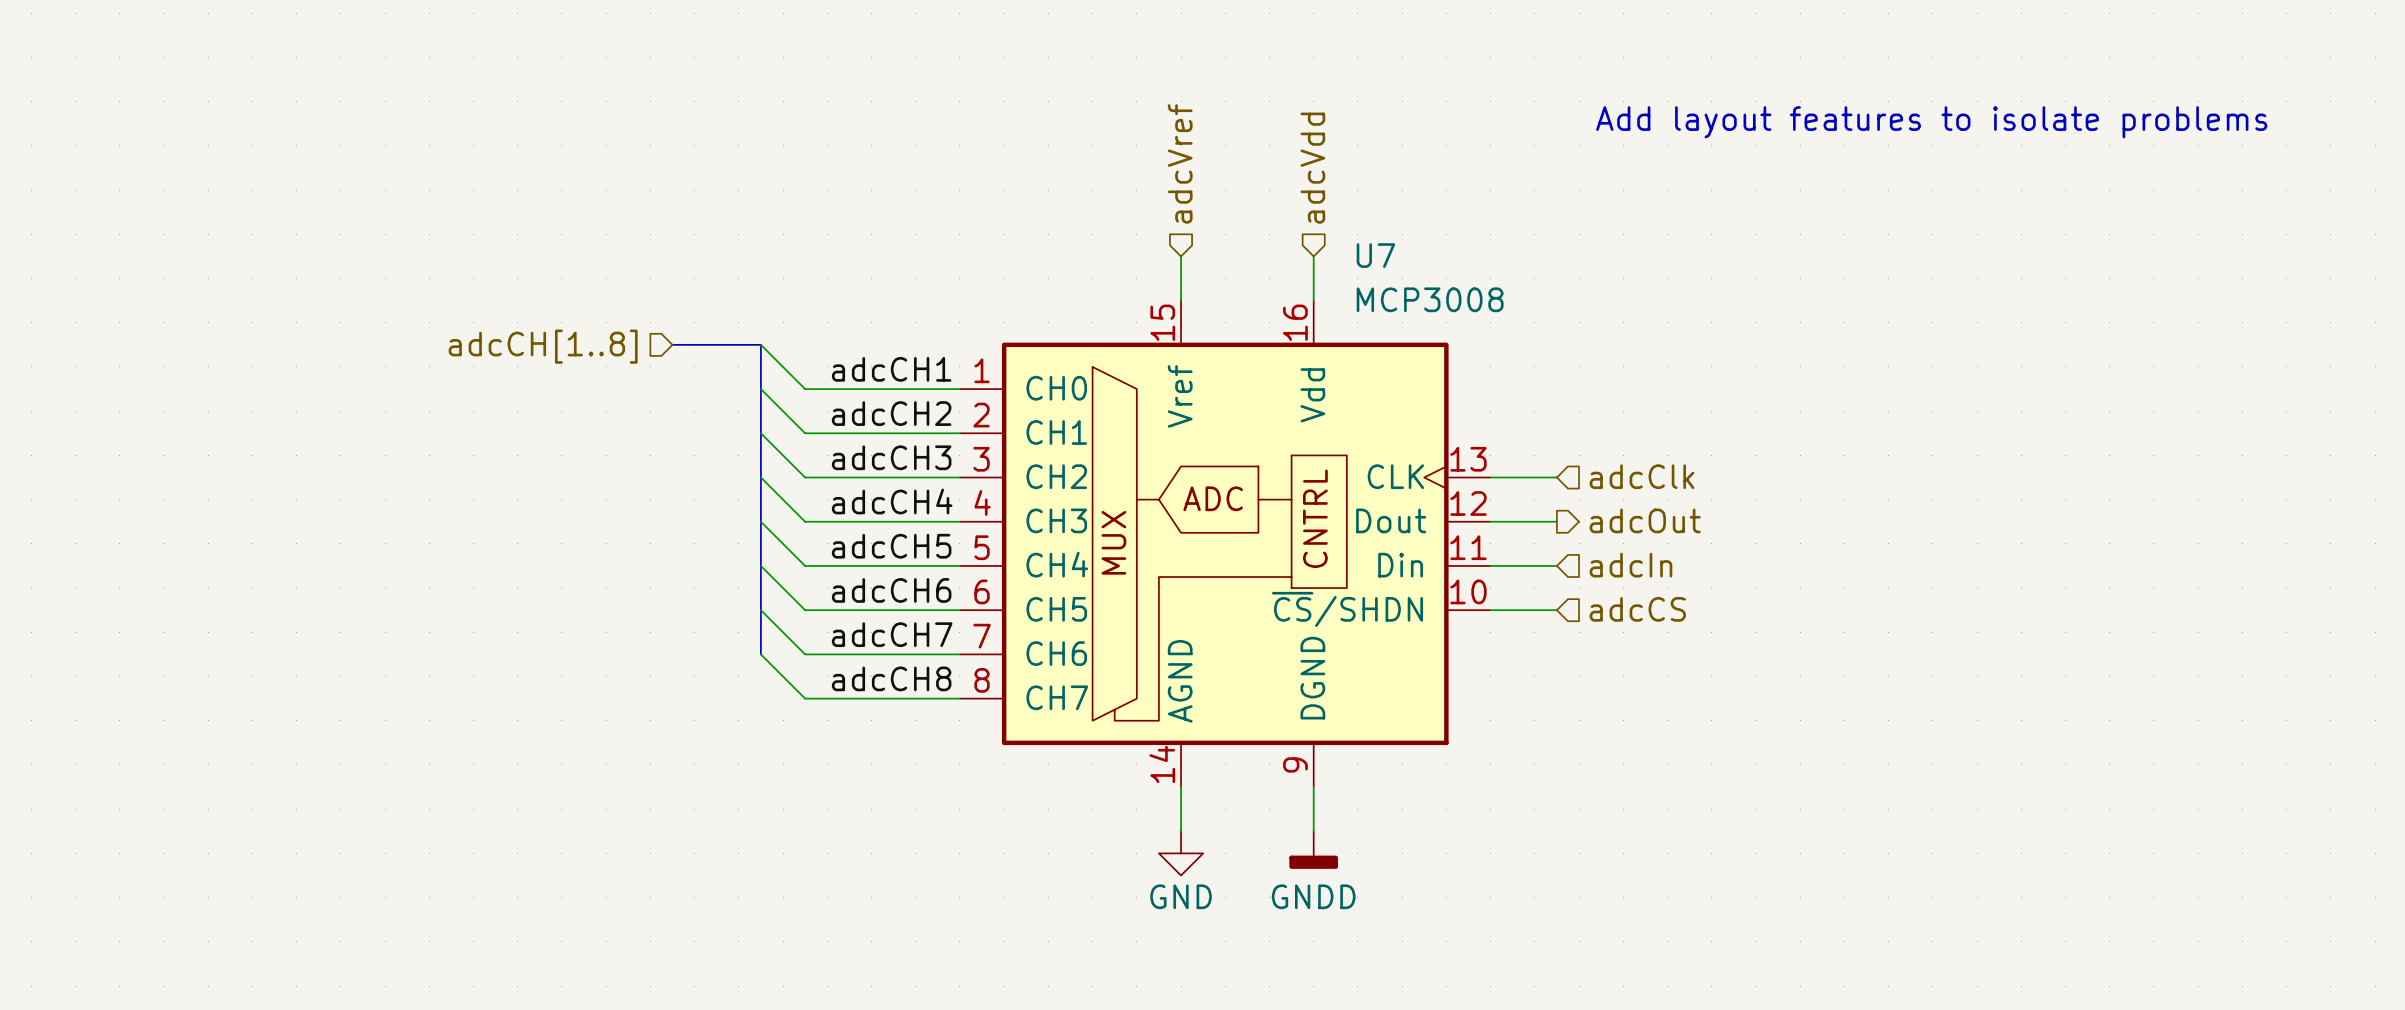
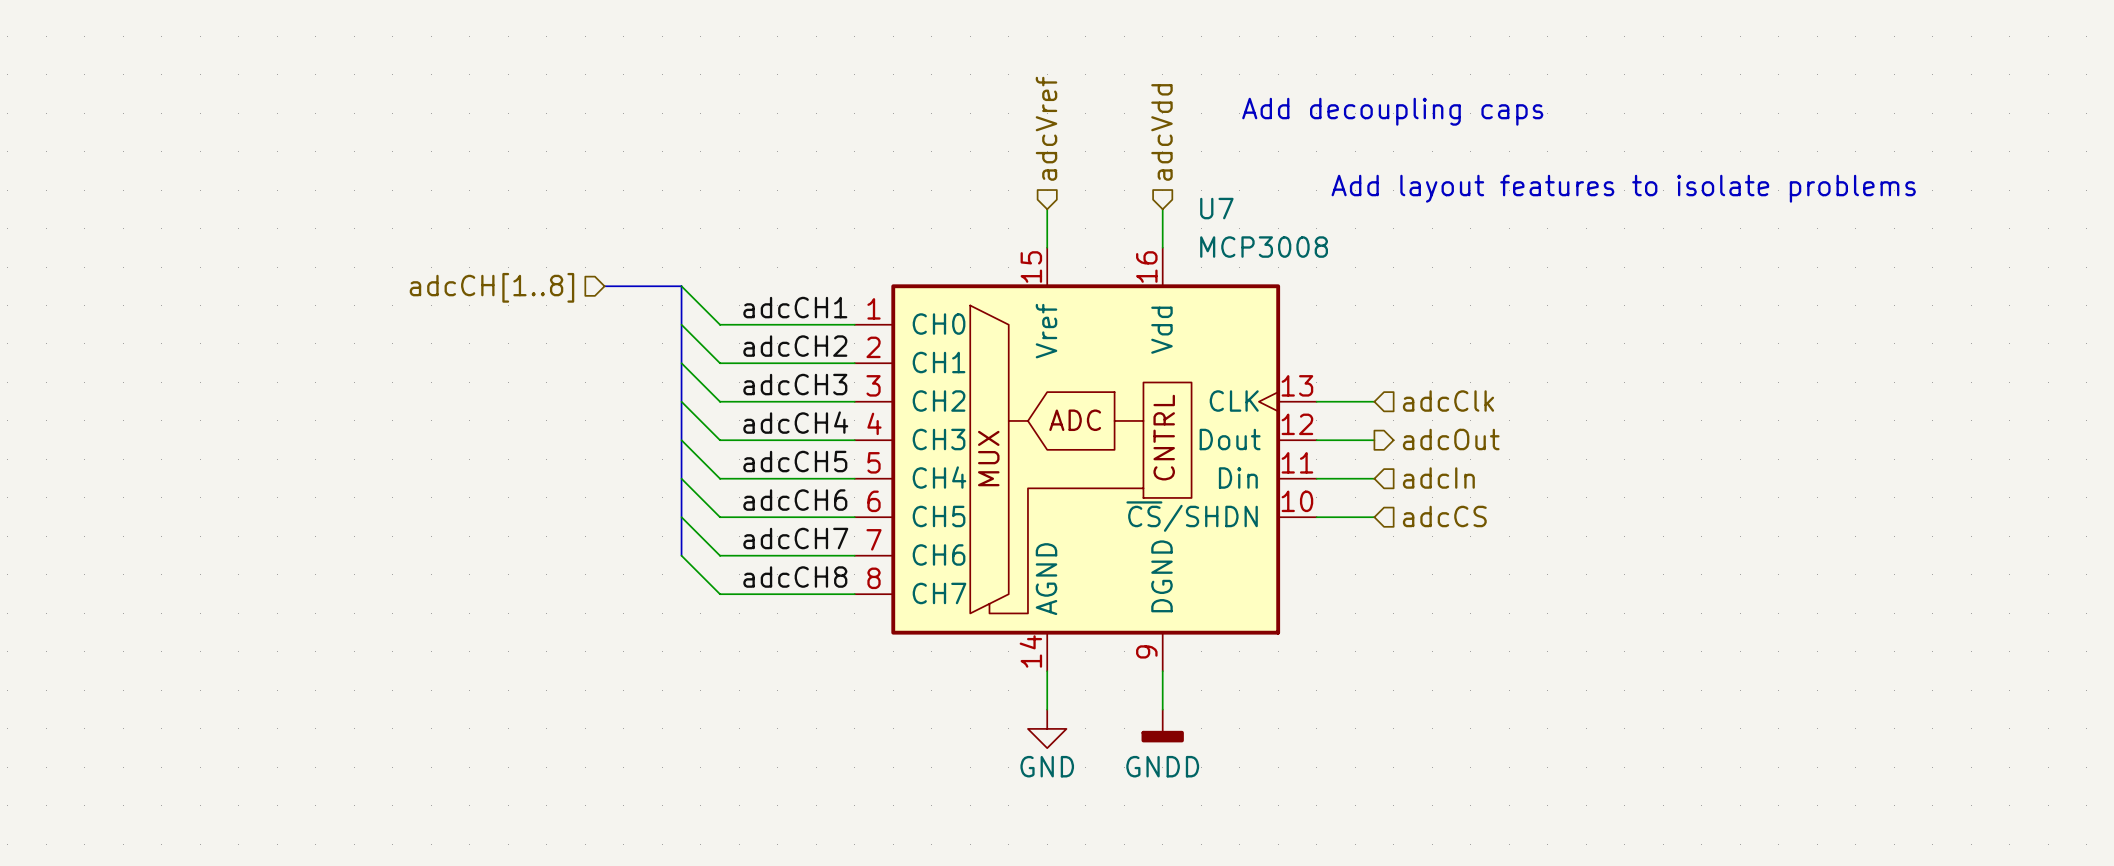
text position: Add layout features to isolate problems (1931, 122) -> Add layout features to isolate problems (1623, 188)
text: none -> Add decoupling caps (1392, 111)

